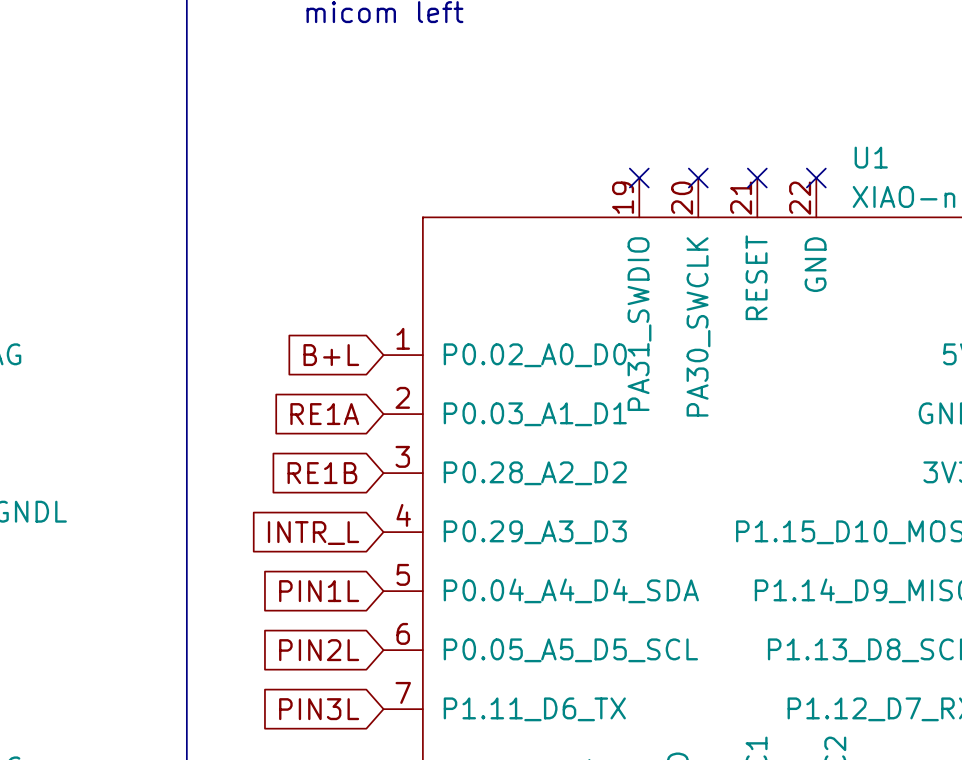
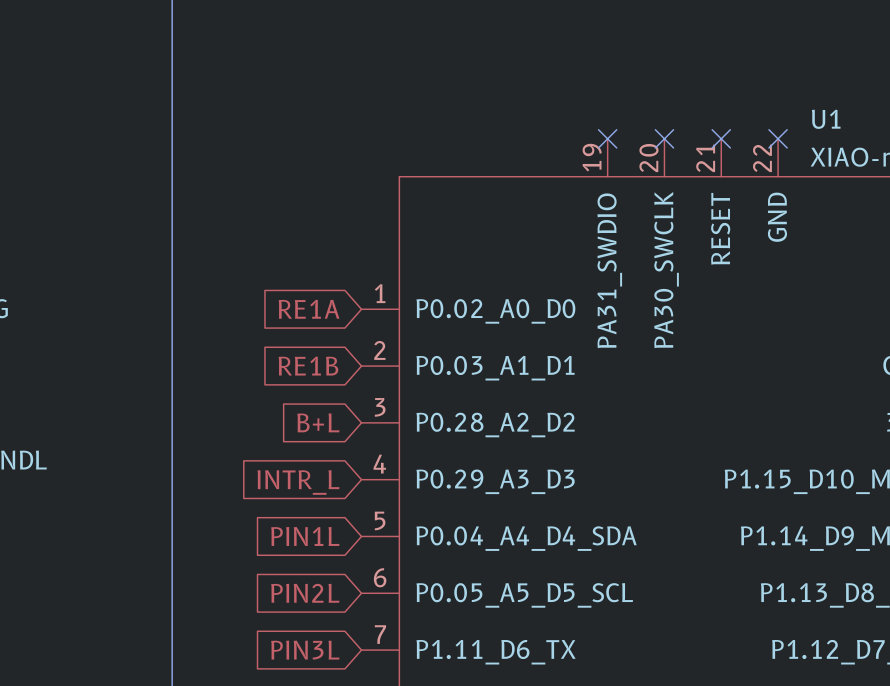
global label: B+L (331, 355) -> RE1A (308, 309)
global label: RE1A (324, 414) -> RE1B (308, 366)
global label: RE1B (322, 473) -> B+L (318, 422)

